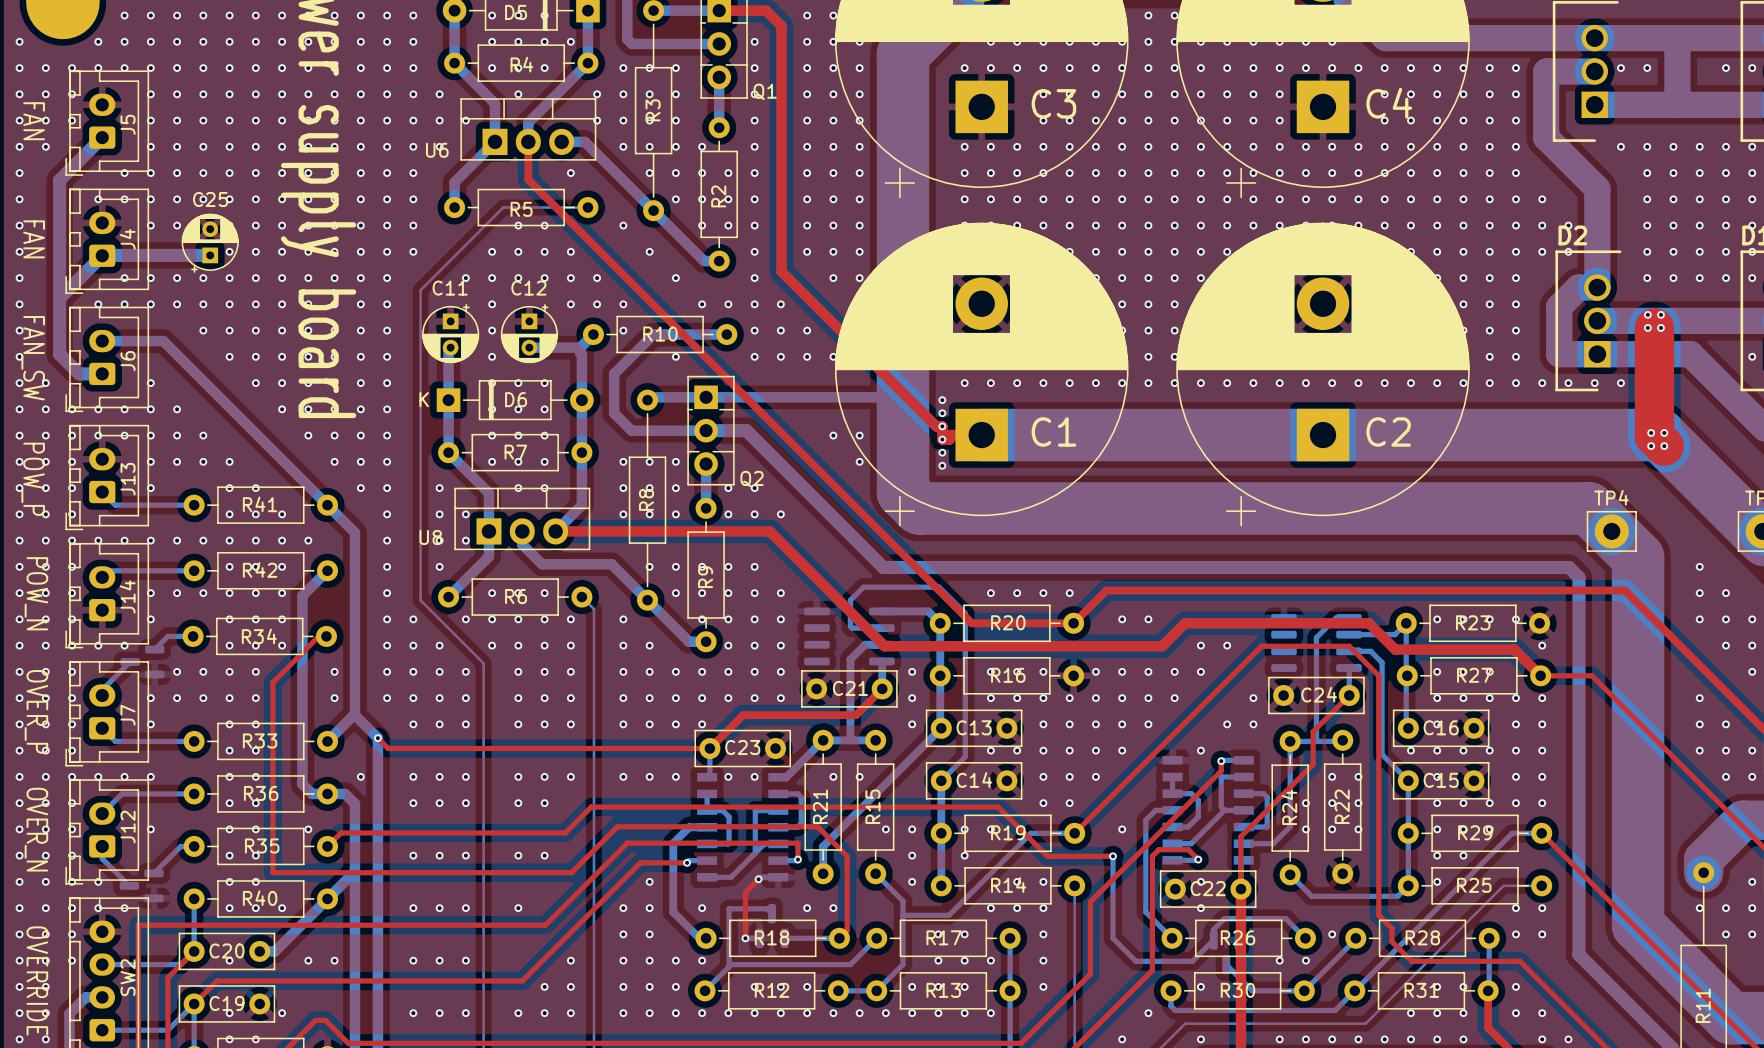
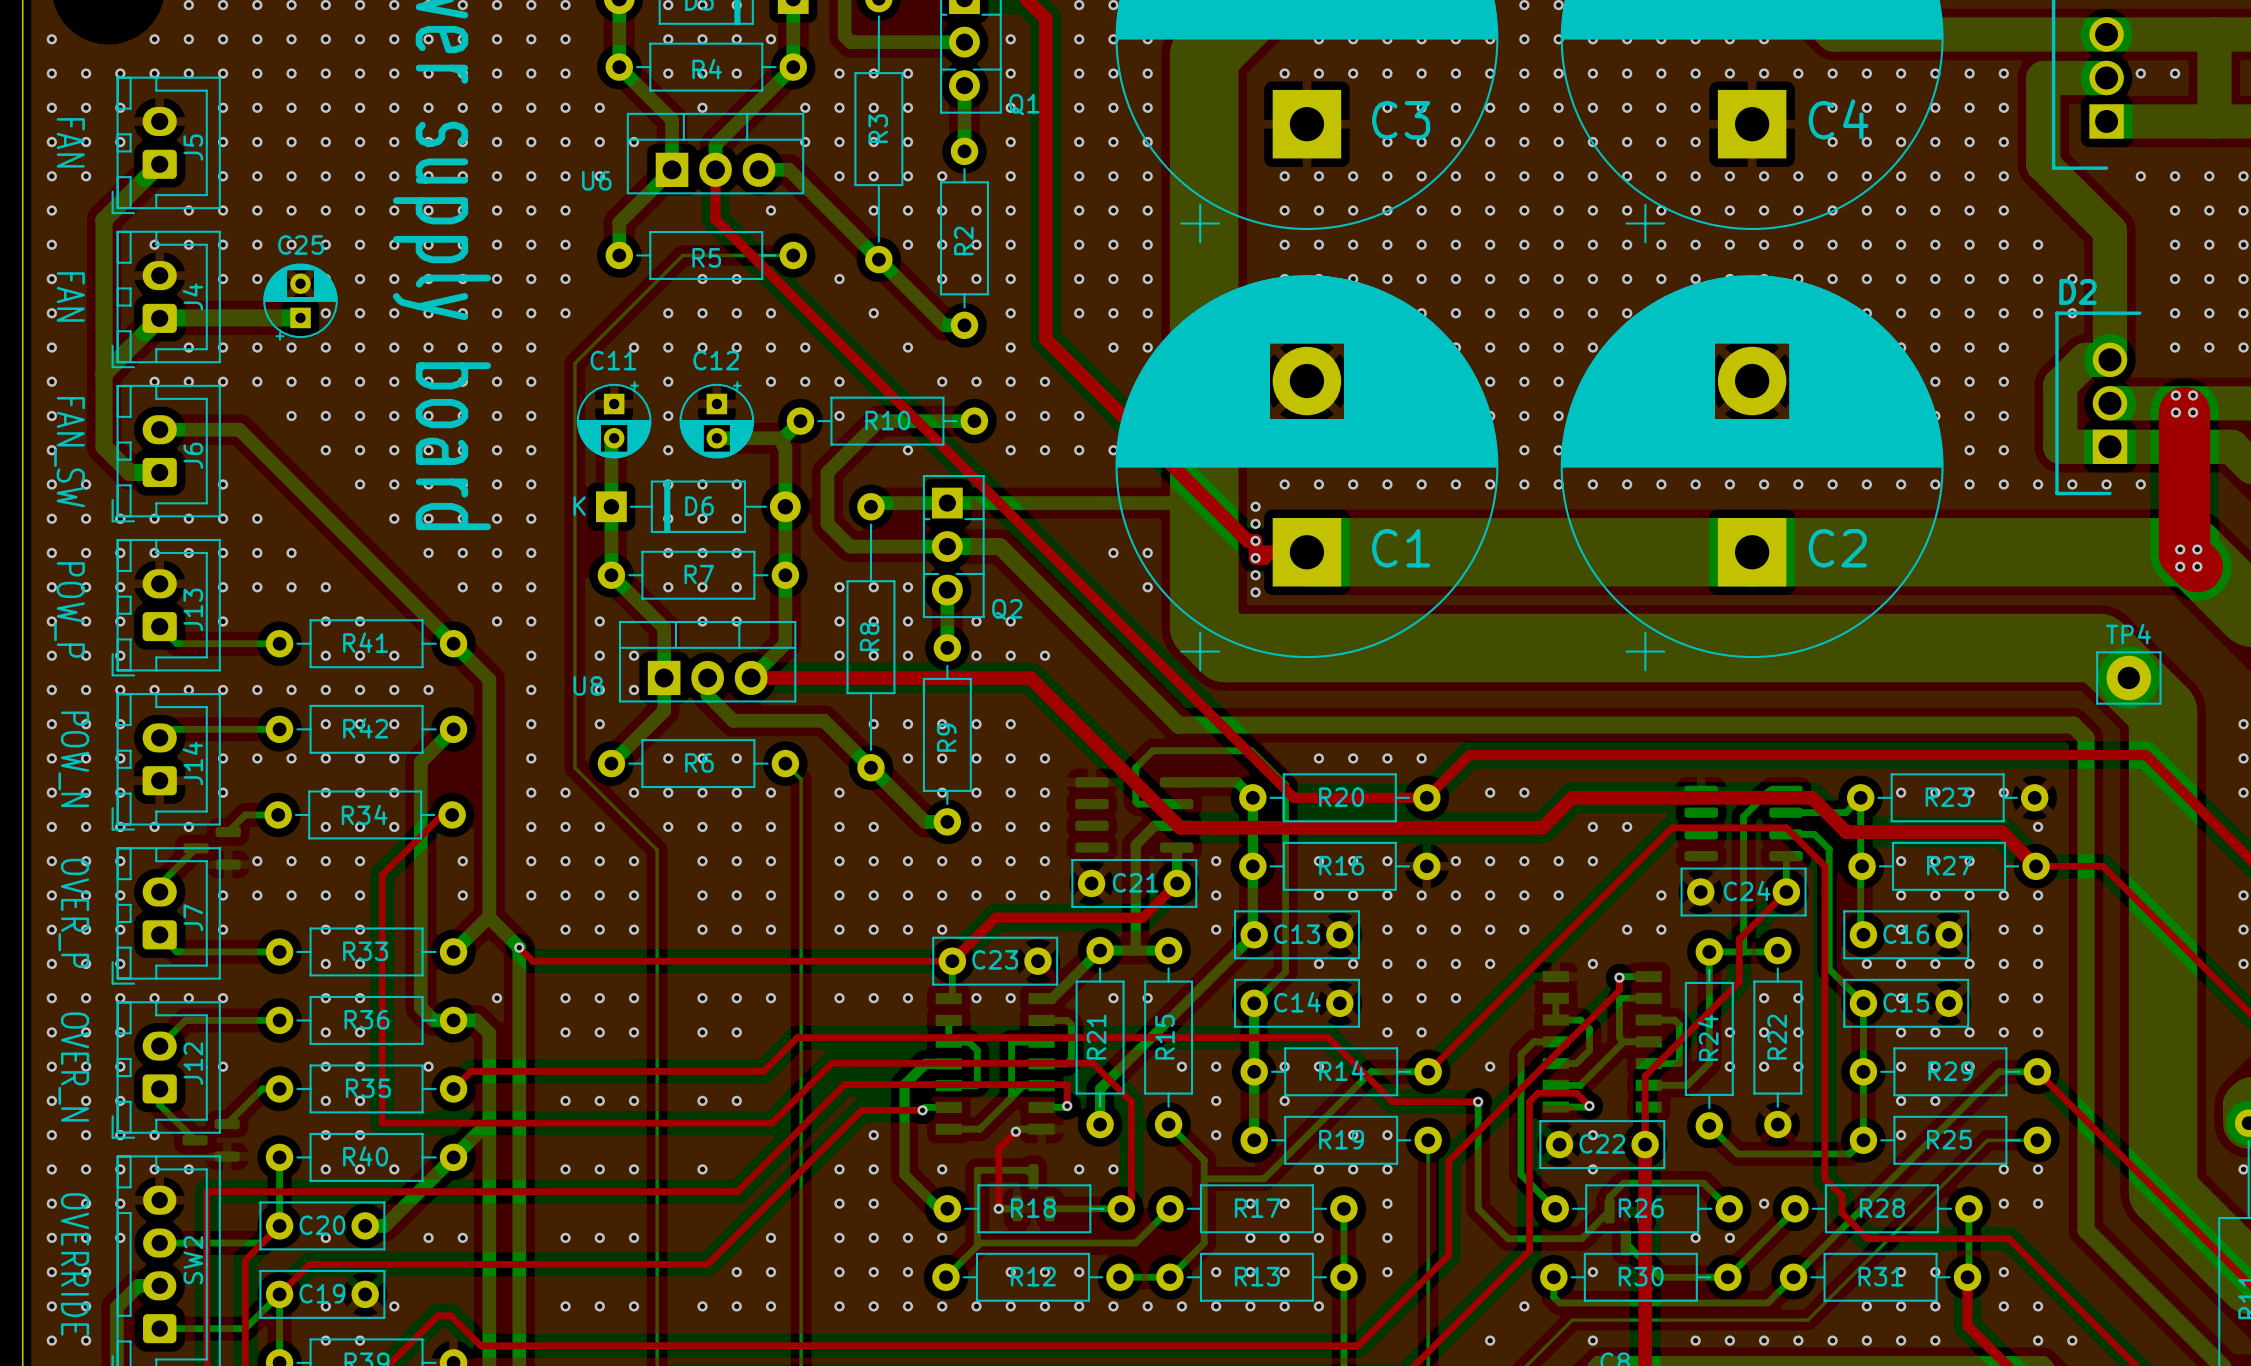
R19 name position: R19 (1008, 832) -> R19 (1341, 1139)
R14 name position: R14 (1008, 885) -> R14 (1342, 1070)

